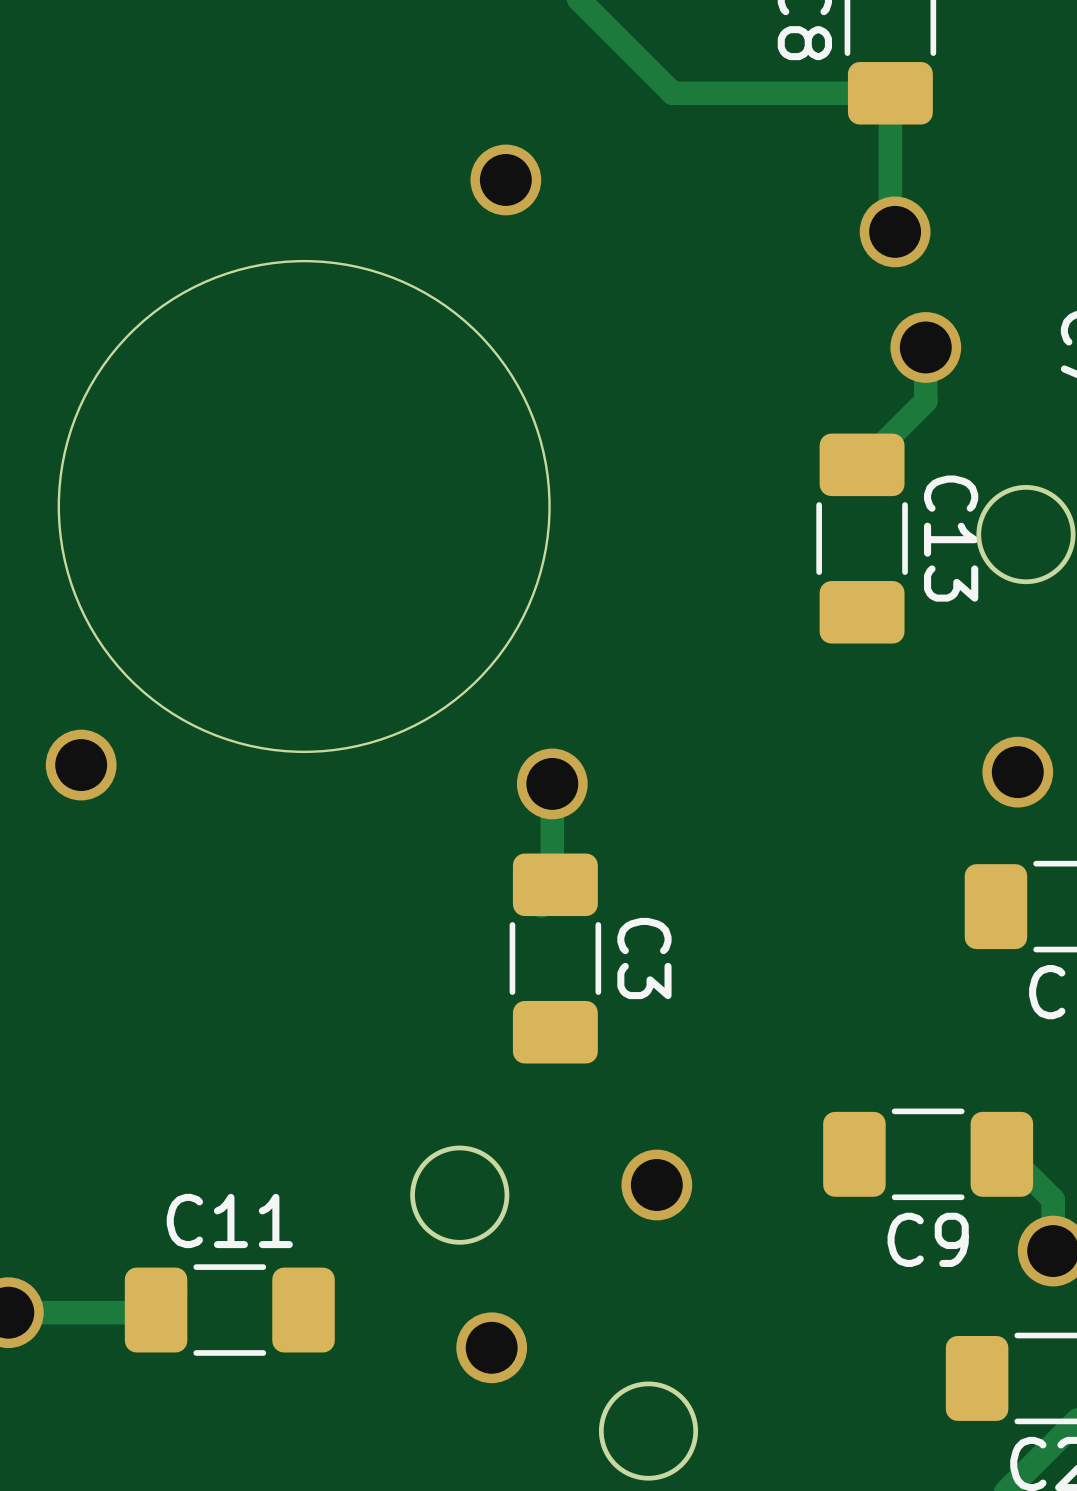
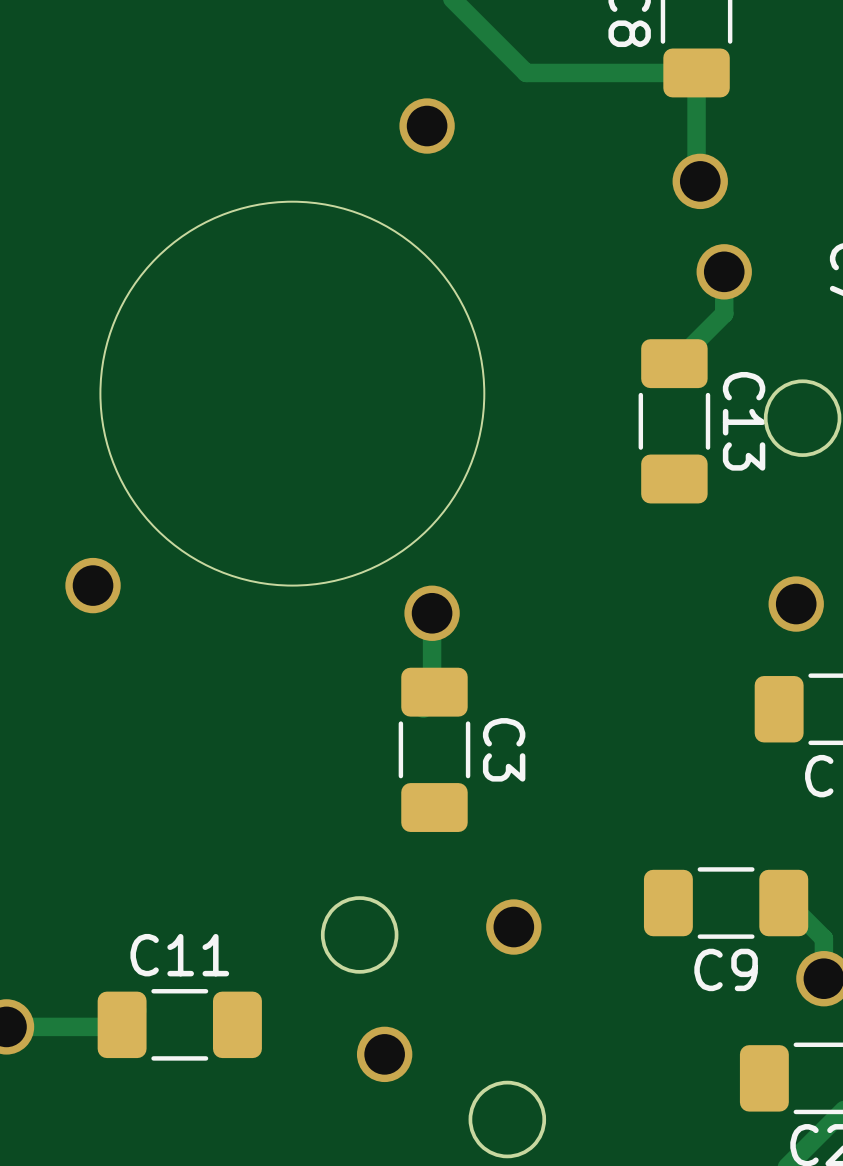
via position: (505, 179) -> (427, 126)
round board edge position: (304, 506) -> (292, 393)
via position: (81, 765) -> (93, 585)

